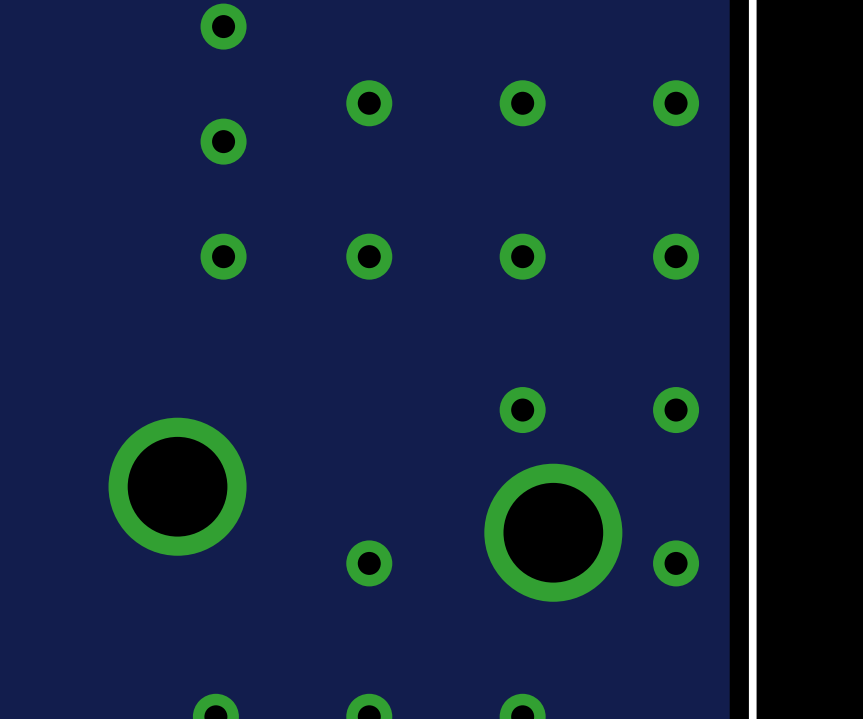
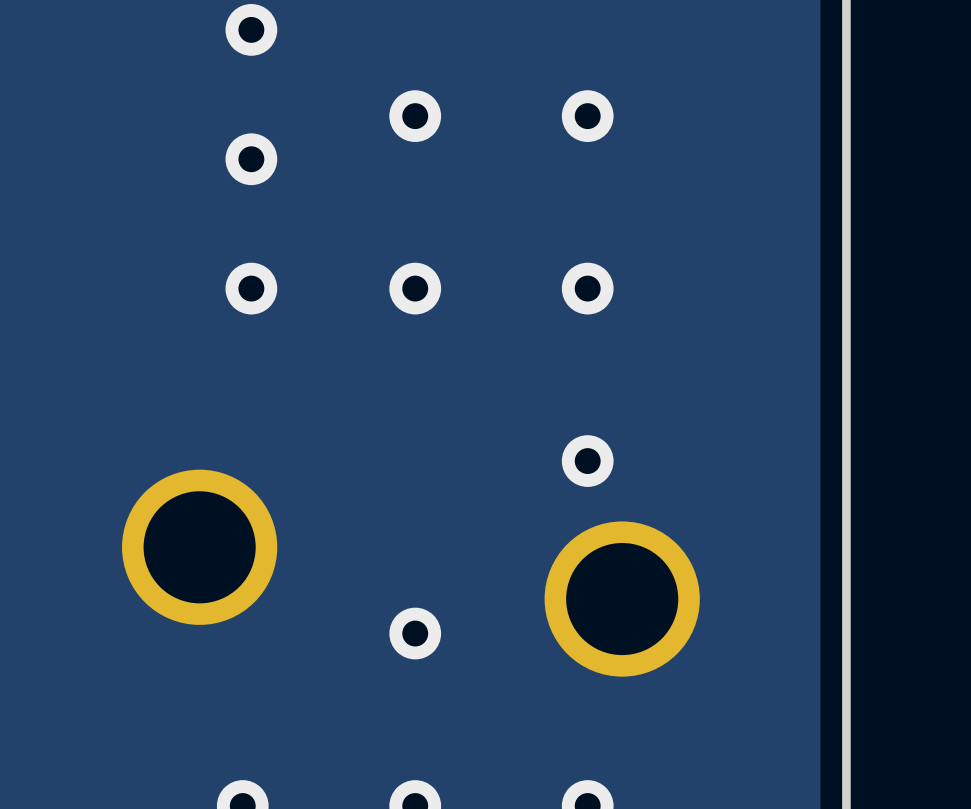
via: (676, 103) -> none
via: (676, 256) -> none
via: (676, 410) -> none
via: (676, 563) -> none

